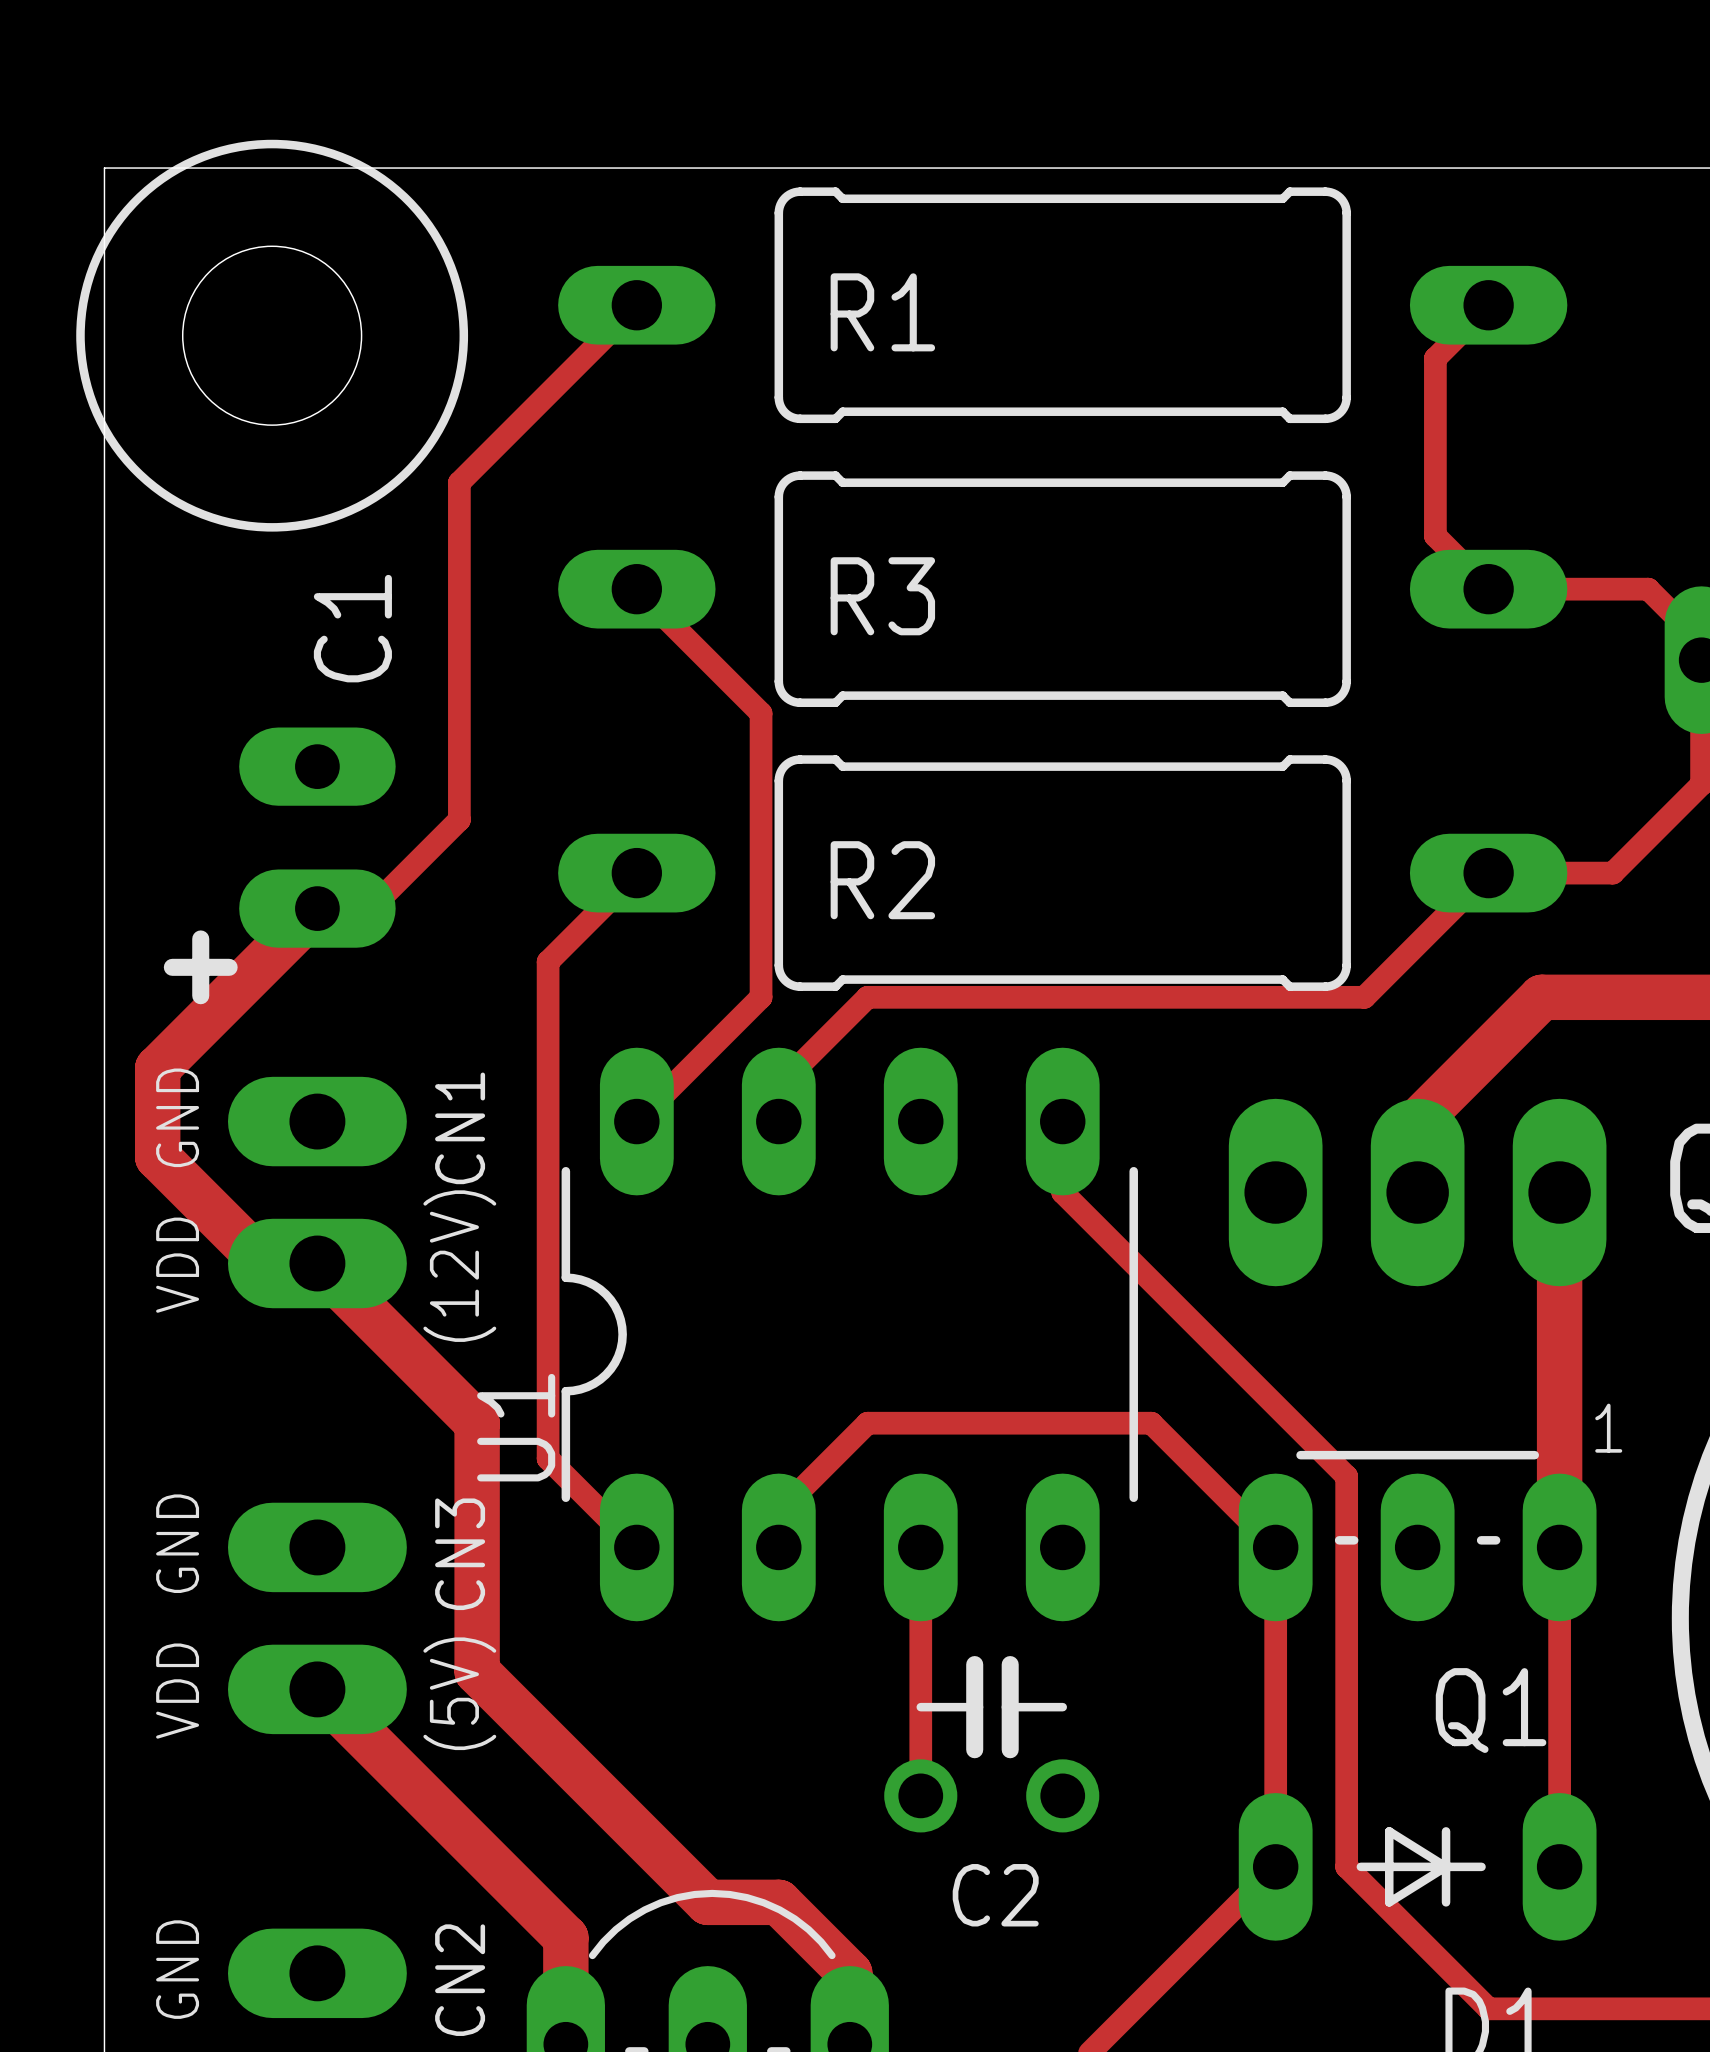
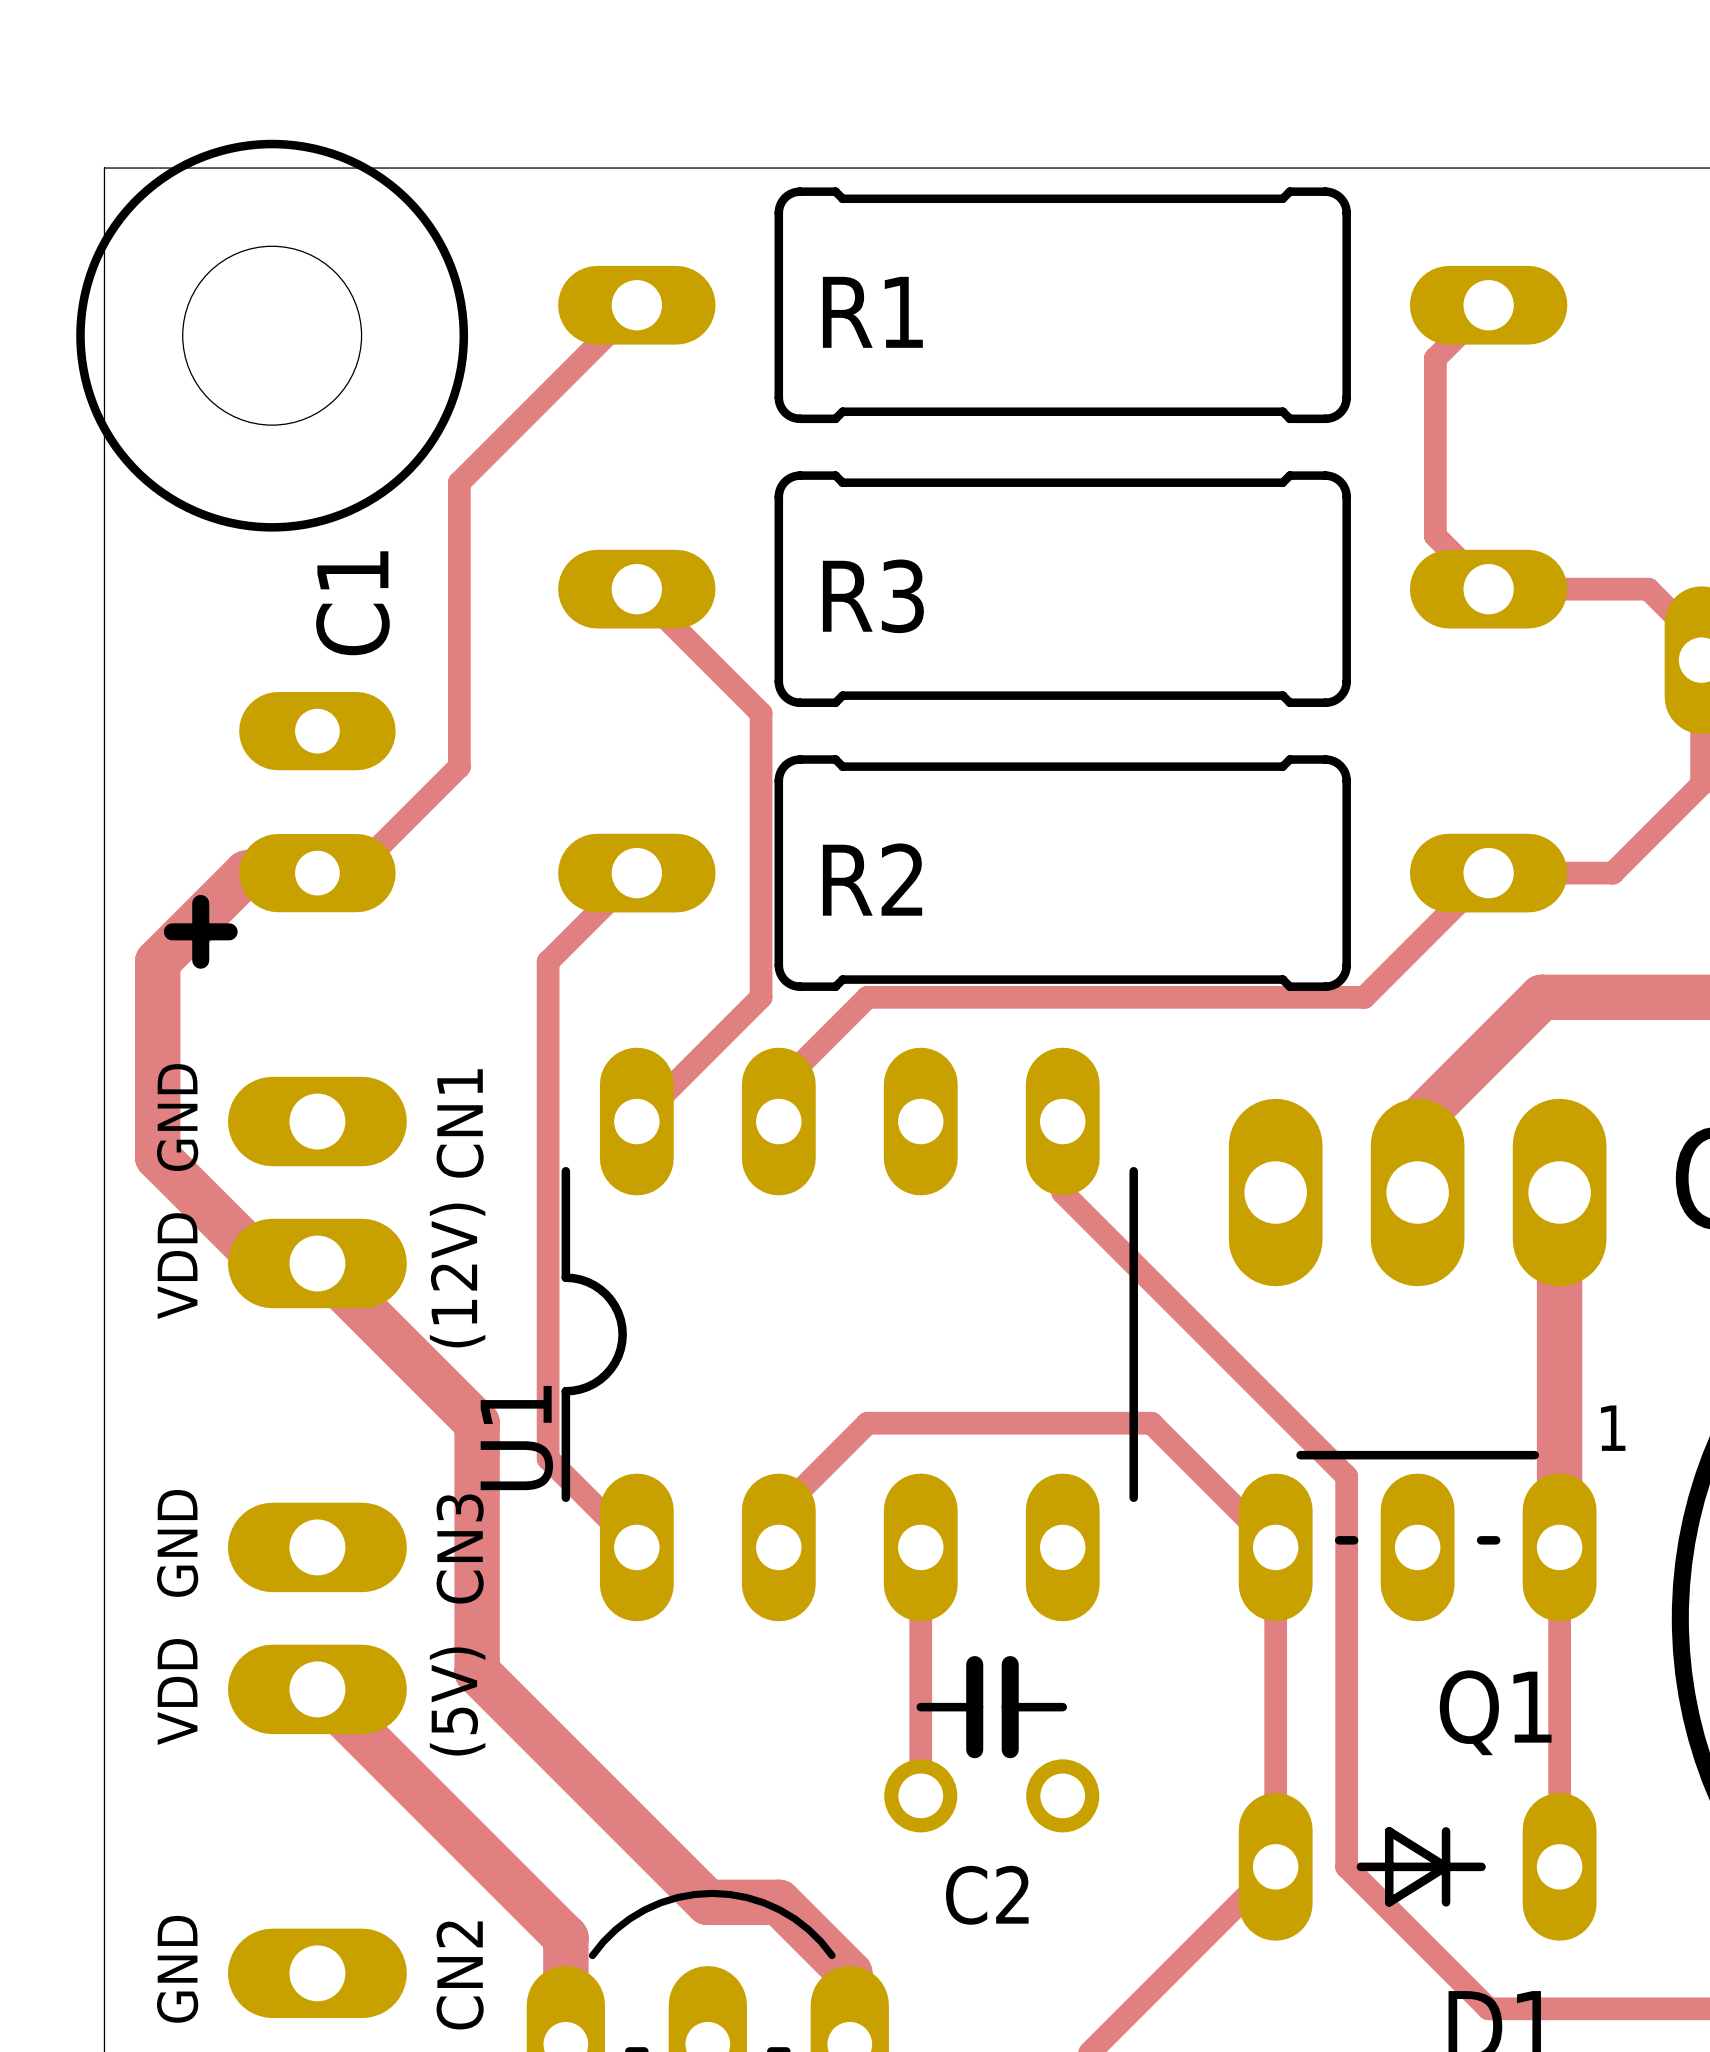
track: (459, 766) (459, 819) (370, 908) (317, 908) (157, 1068) -> (459, 766) (352, 873) (246, 873) (157, 961) (157, 1068)
C1 position: (279, 865) -> (279, 830)

